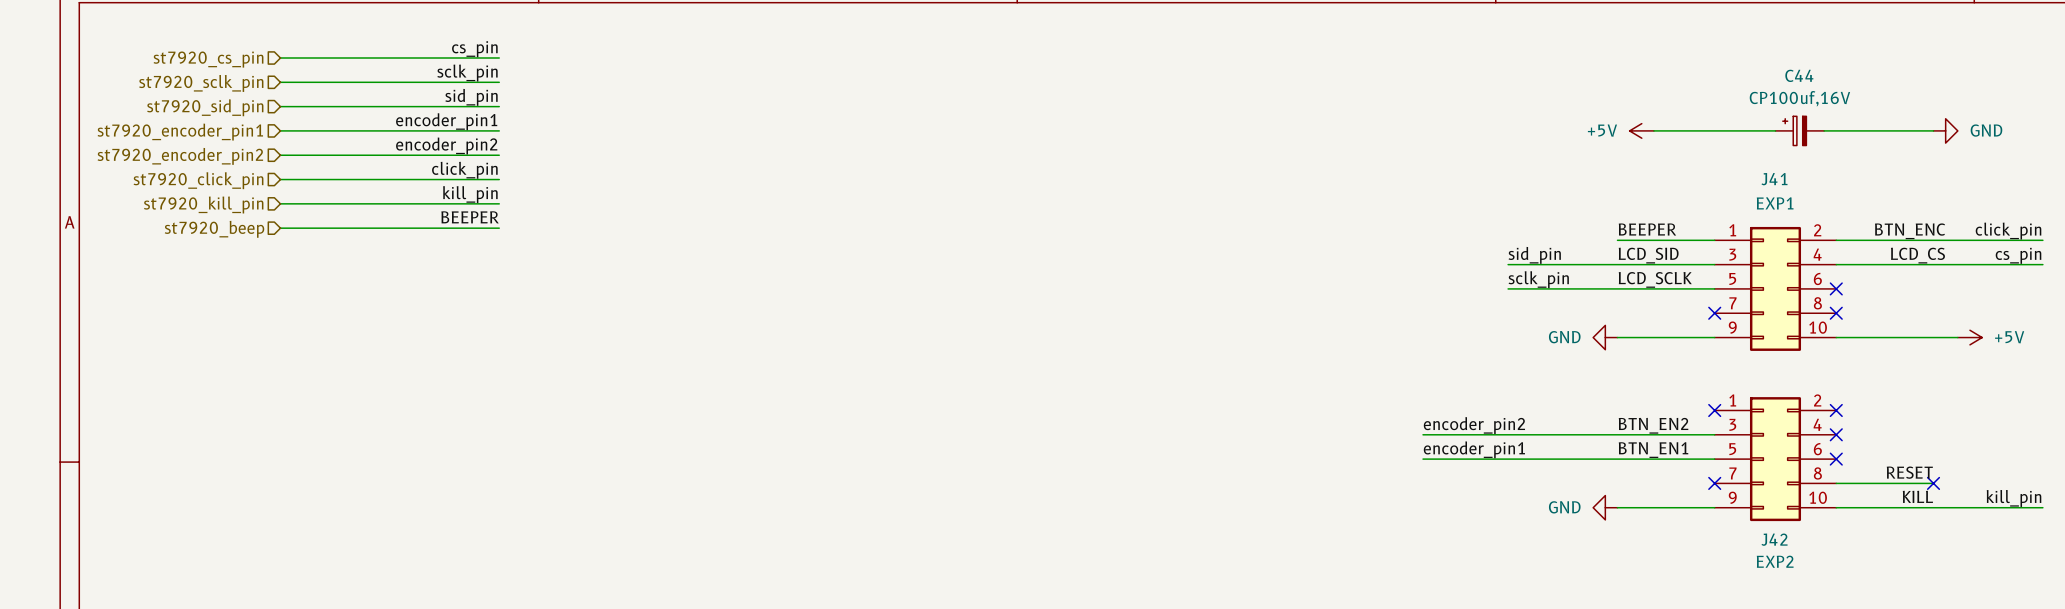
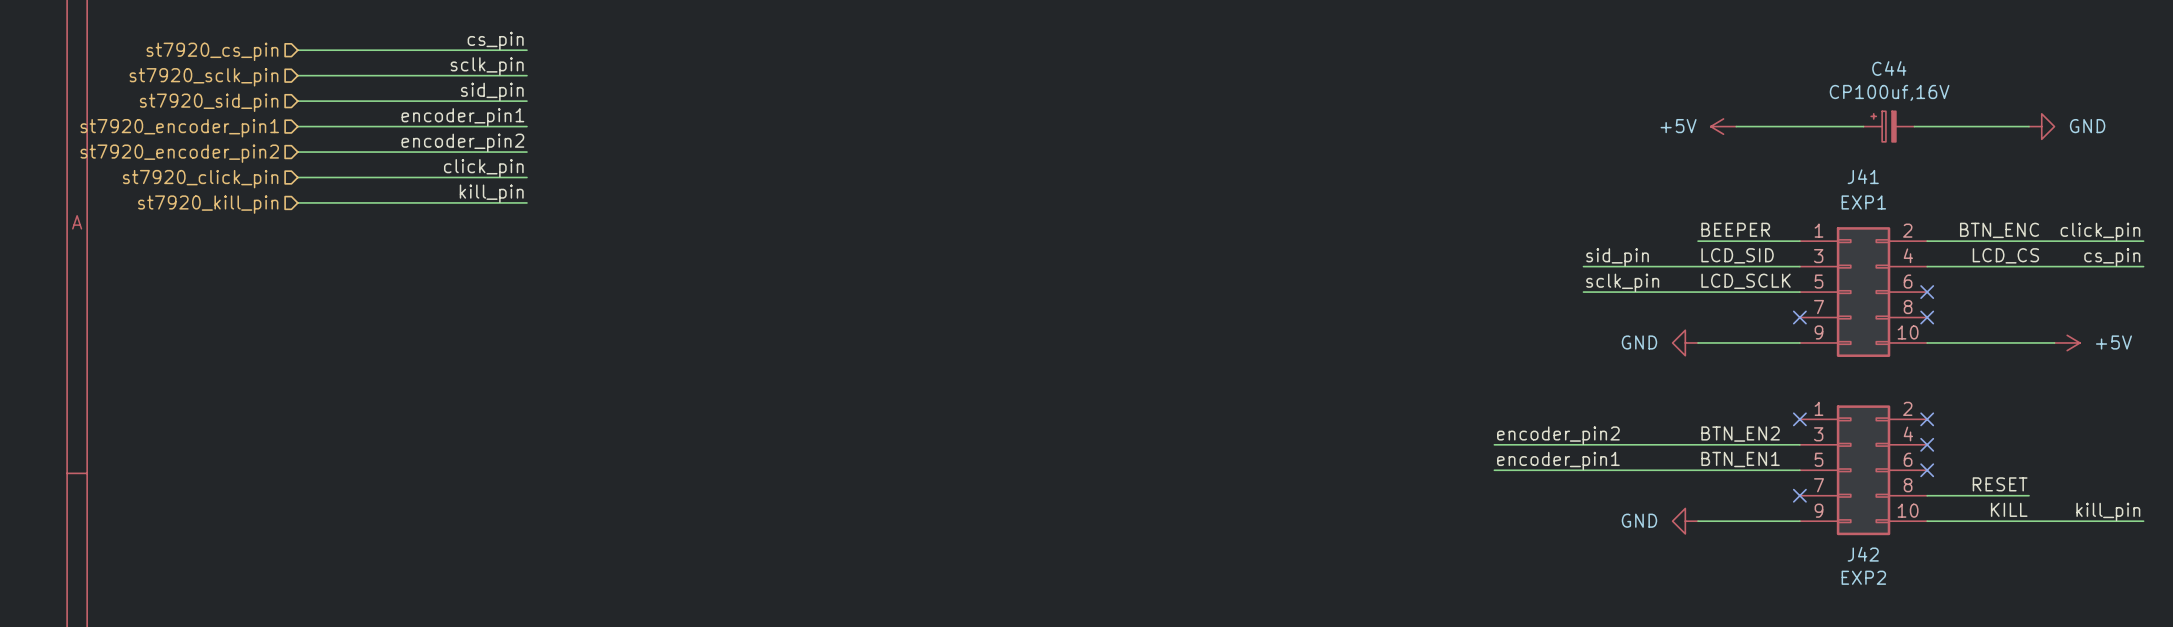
label: BEEPER (470, 217) -> none
wire: (280, 228) (499, 228) -> none
hierarchical label: st7920_beep (214, 229) -> none
no-connect mark: (1933, 483) -> none

